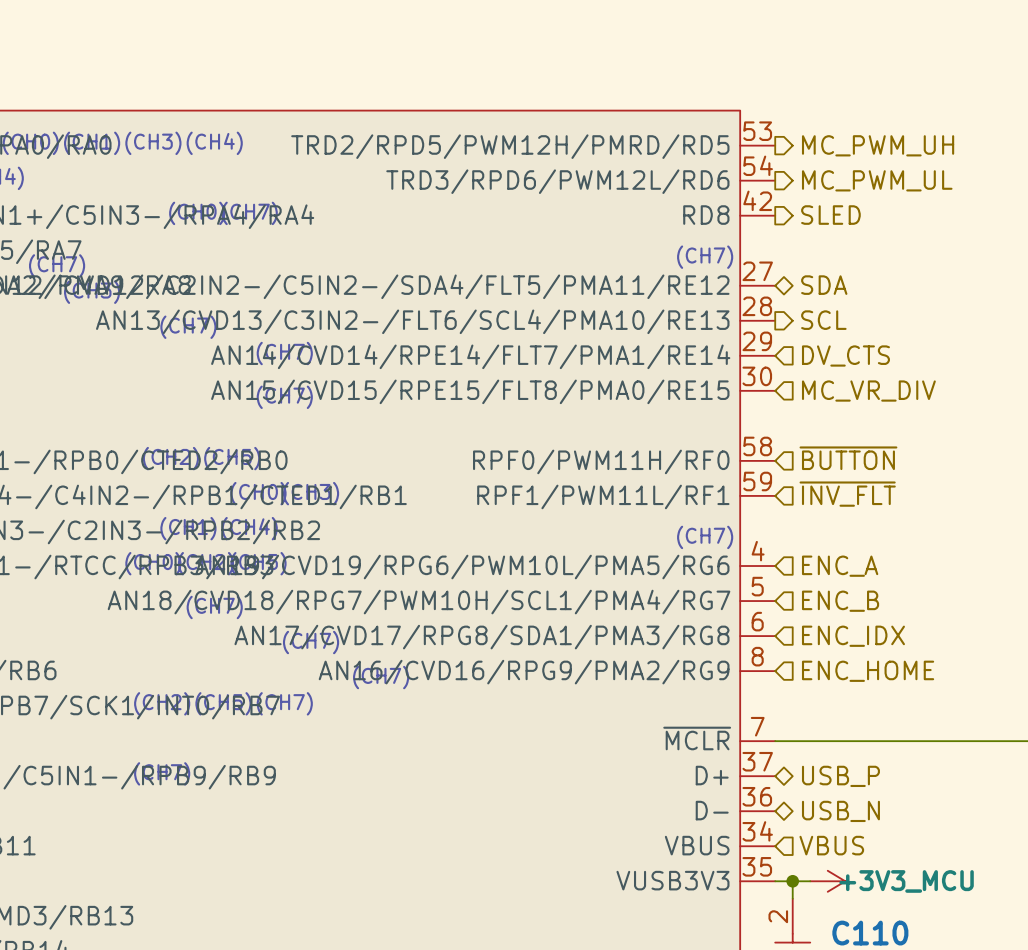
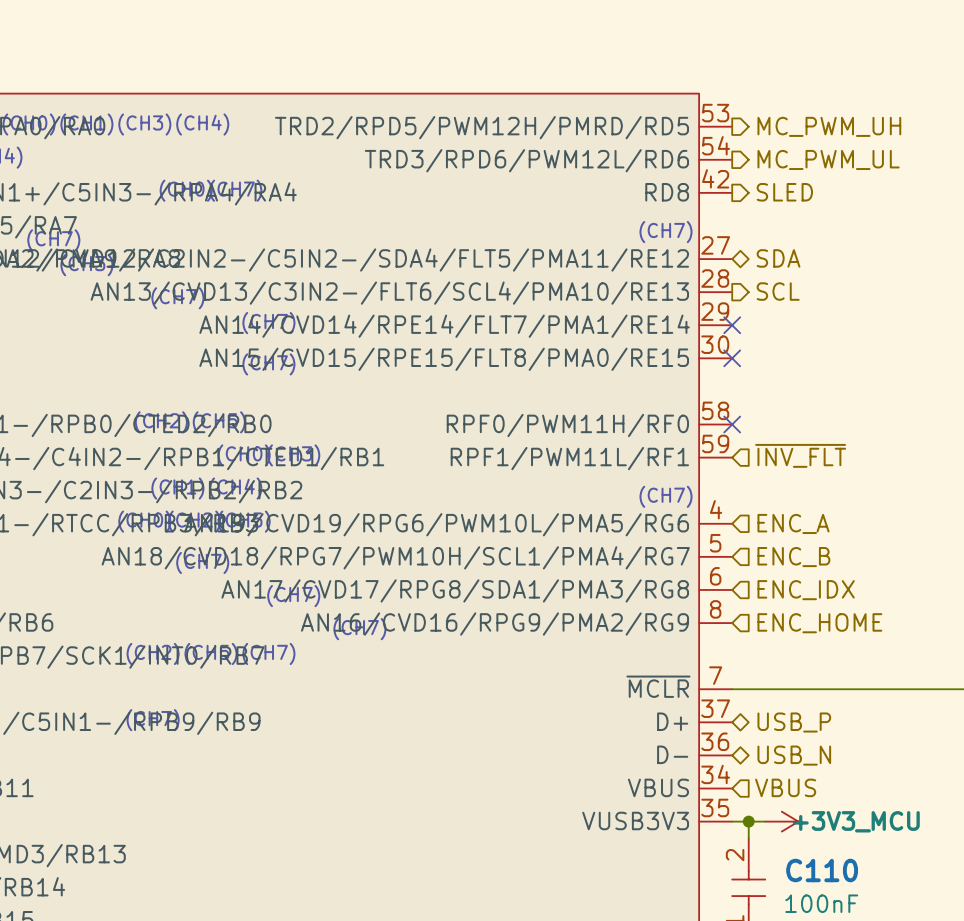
no-connect mark: none -> (732, 325)
hierarchical label: DV_CTS (845, 355) -> none
no-connect mark: none -> (732, 358)
hierarchical label: MC_VR_DIV (868, 391) -> none
hierarchical label: ~{BUTTON} (848, 458) -> none
no-connect mark: none -> (732, 424)

